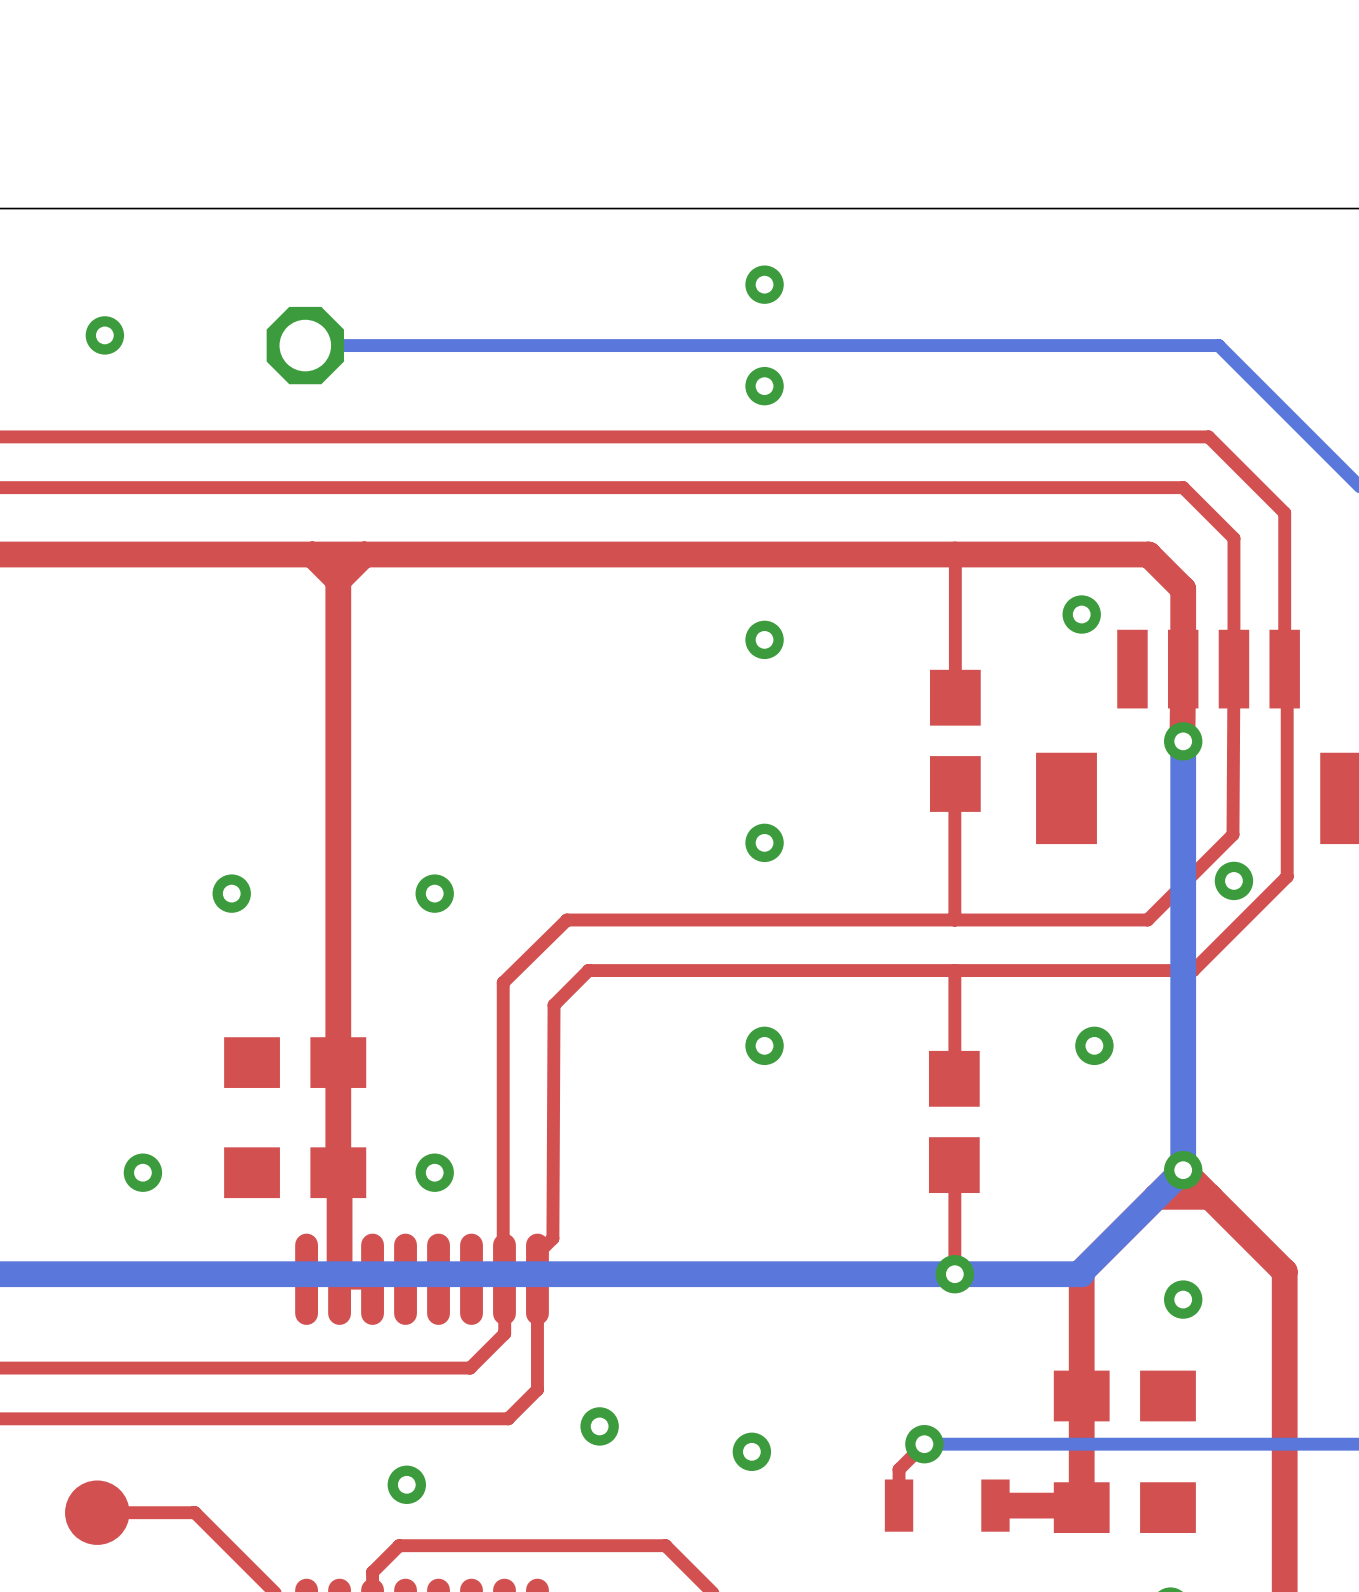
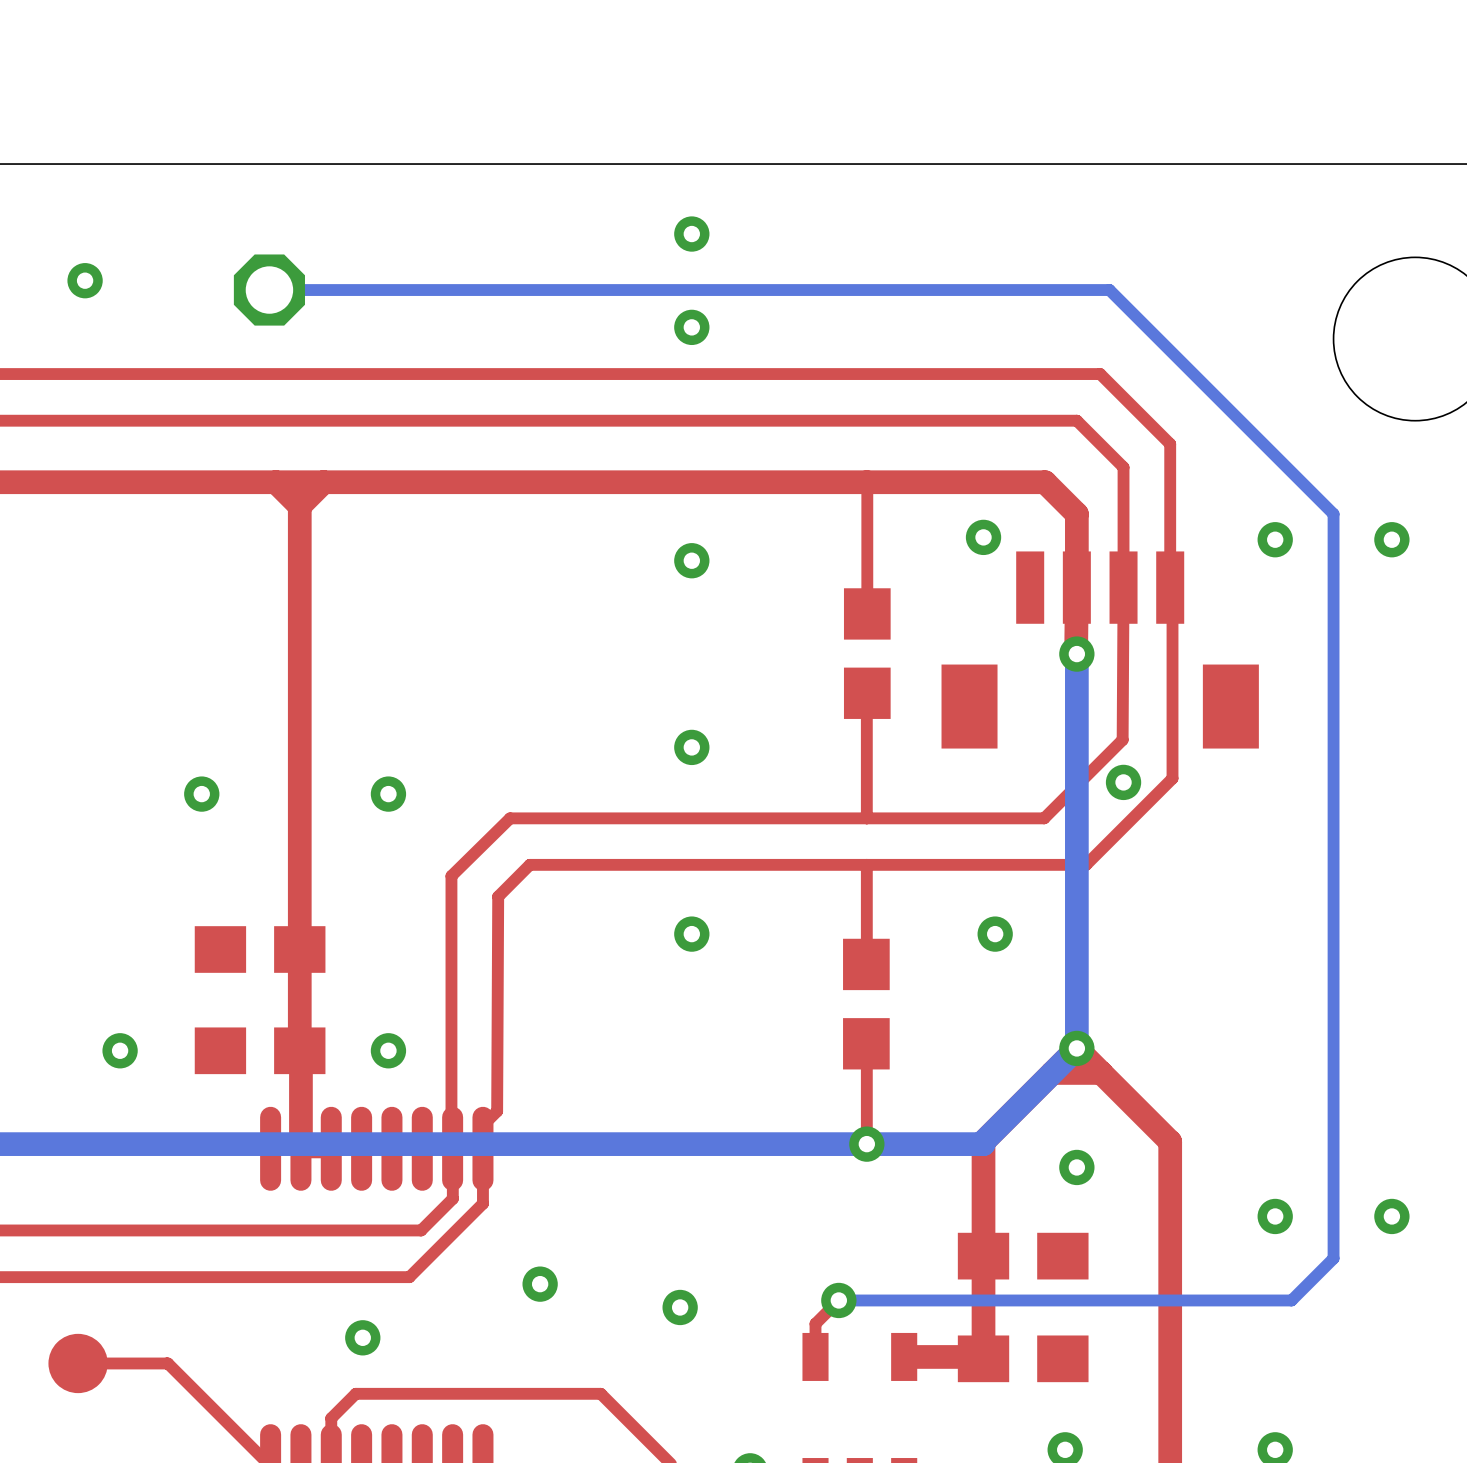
top track: (537, 1338) (537, 1389) (508, 1418) (457, 1418) -> (482, 1203) (409, 1277)

